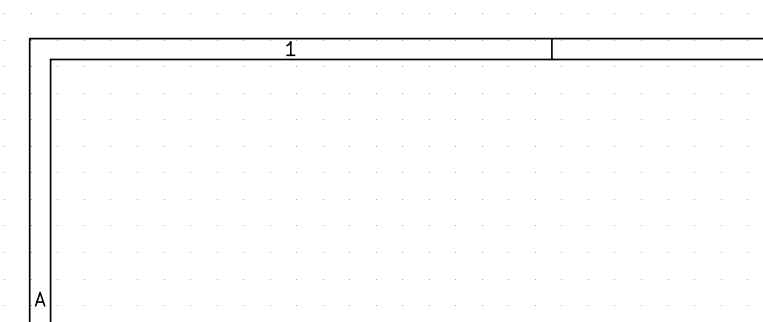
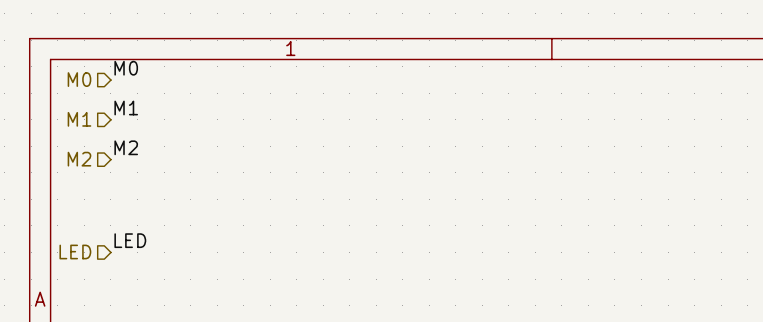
label: none -> M0 (126, 68)
hierarchical label: none -> M0 (79, 79)
label: none -> M1 (126, 108)
hierarchical label: none -> M1 (79, 119)
label: none -> M2 (126, 147)
hierarchical label: none -> M2 (79, 159)
label: none -> LED (130, 240)
hierarchical label: none -> LED (75, 251)

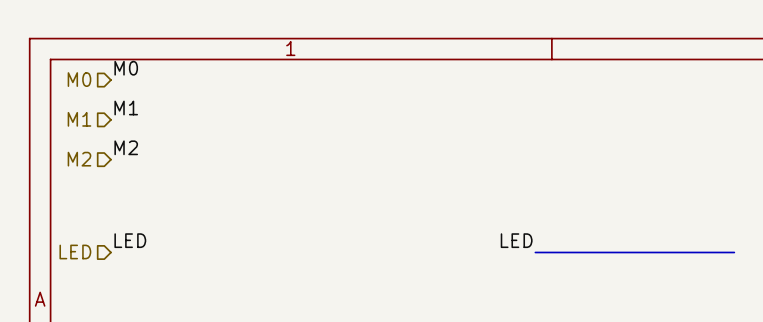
label: none -> LED (516, 240)
bus: none -> (535, 252) (734, 252)

